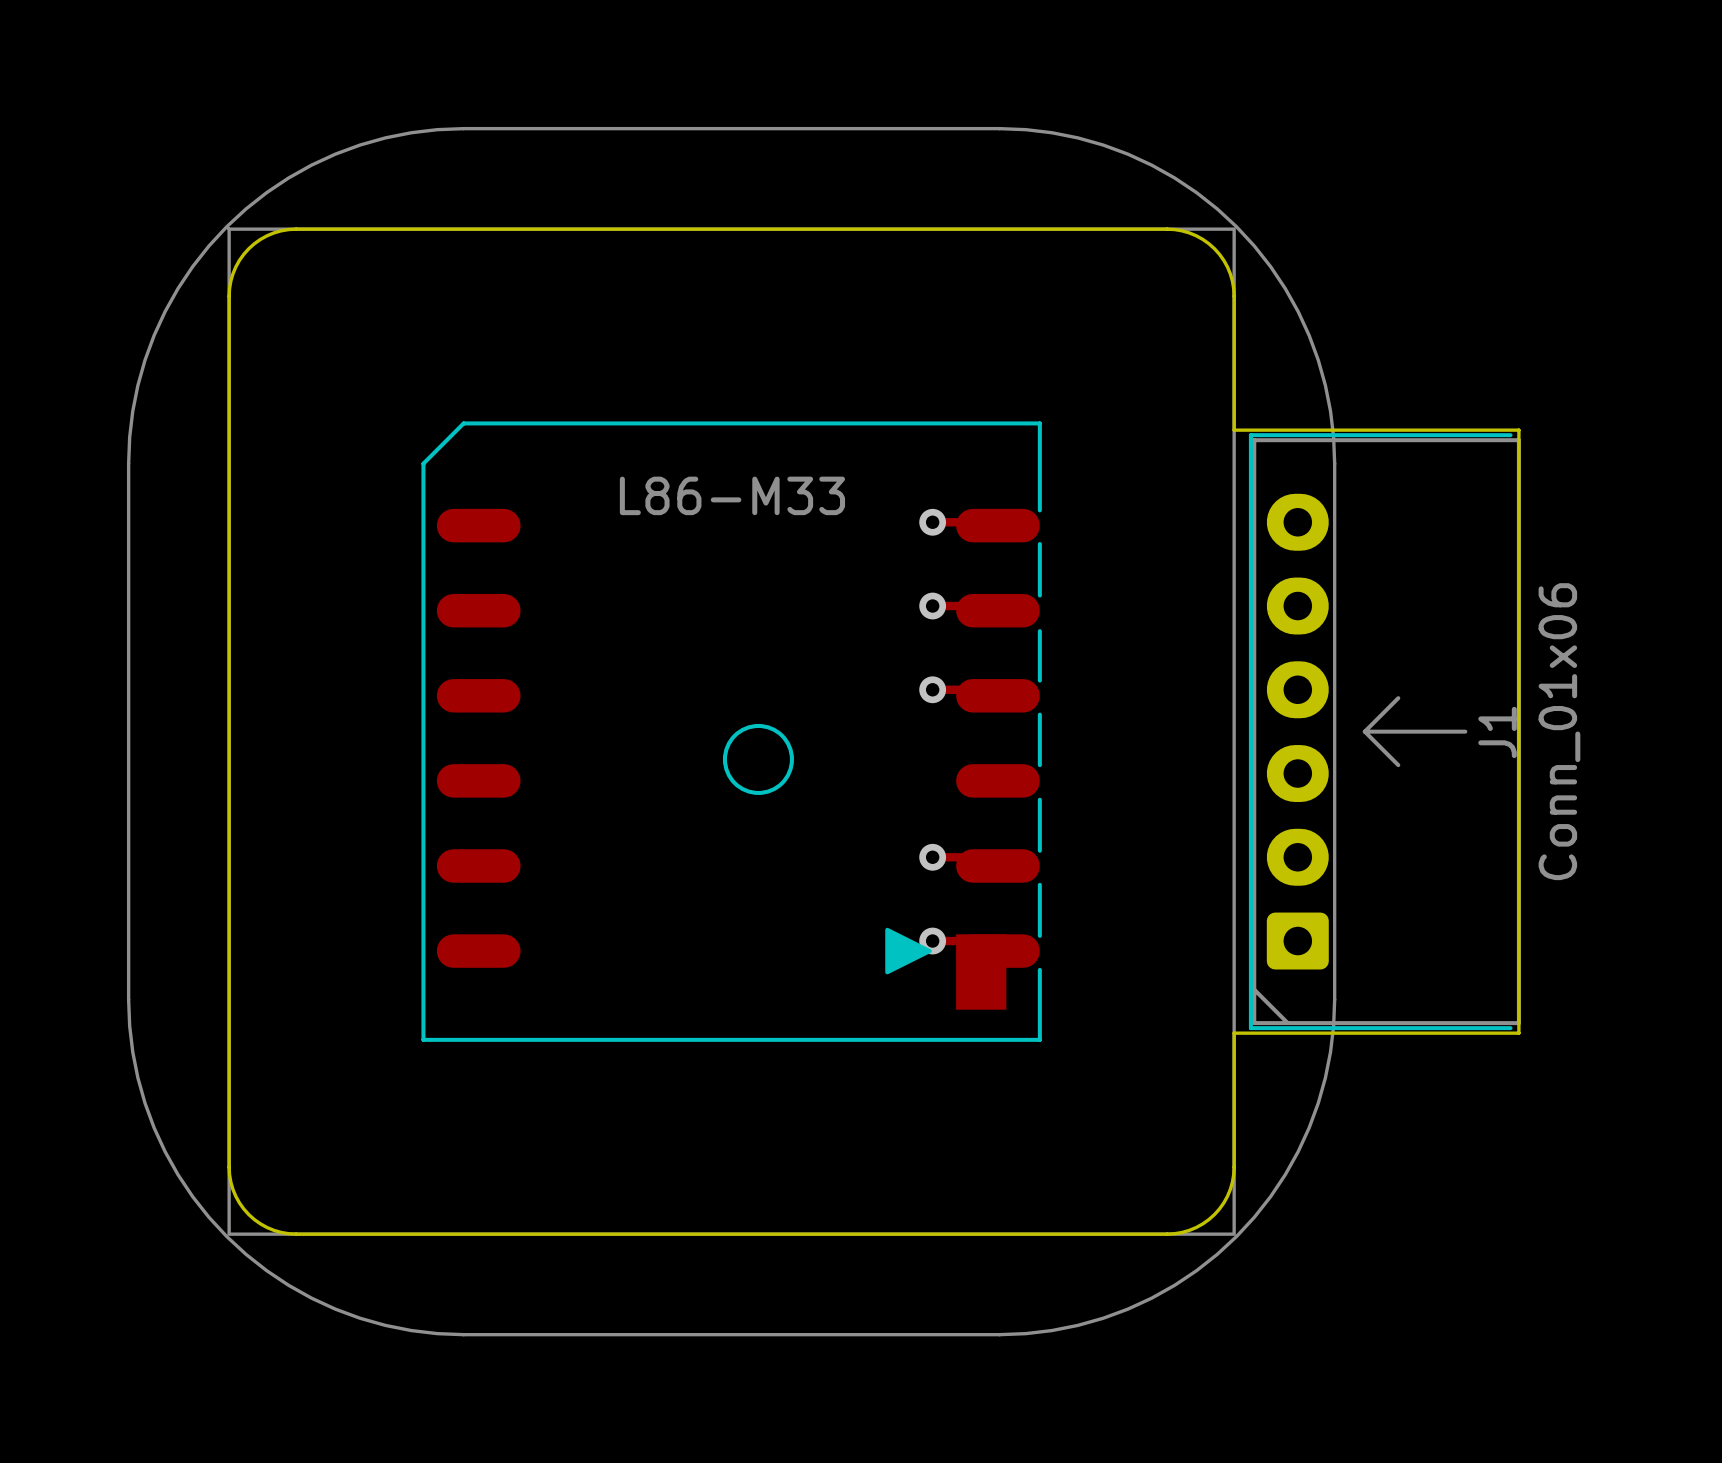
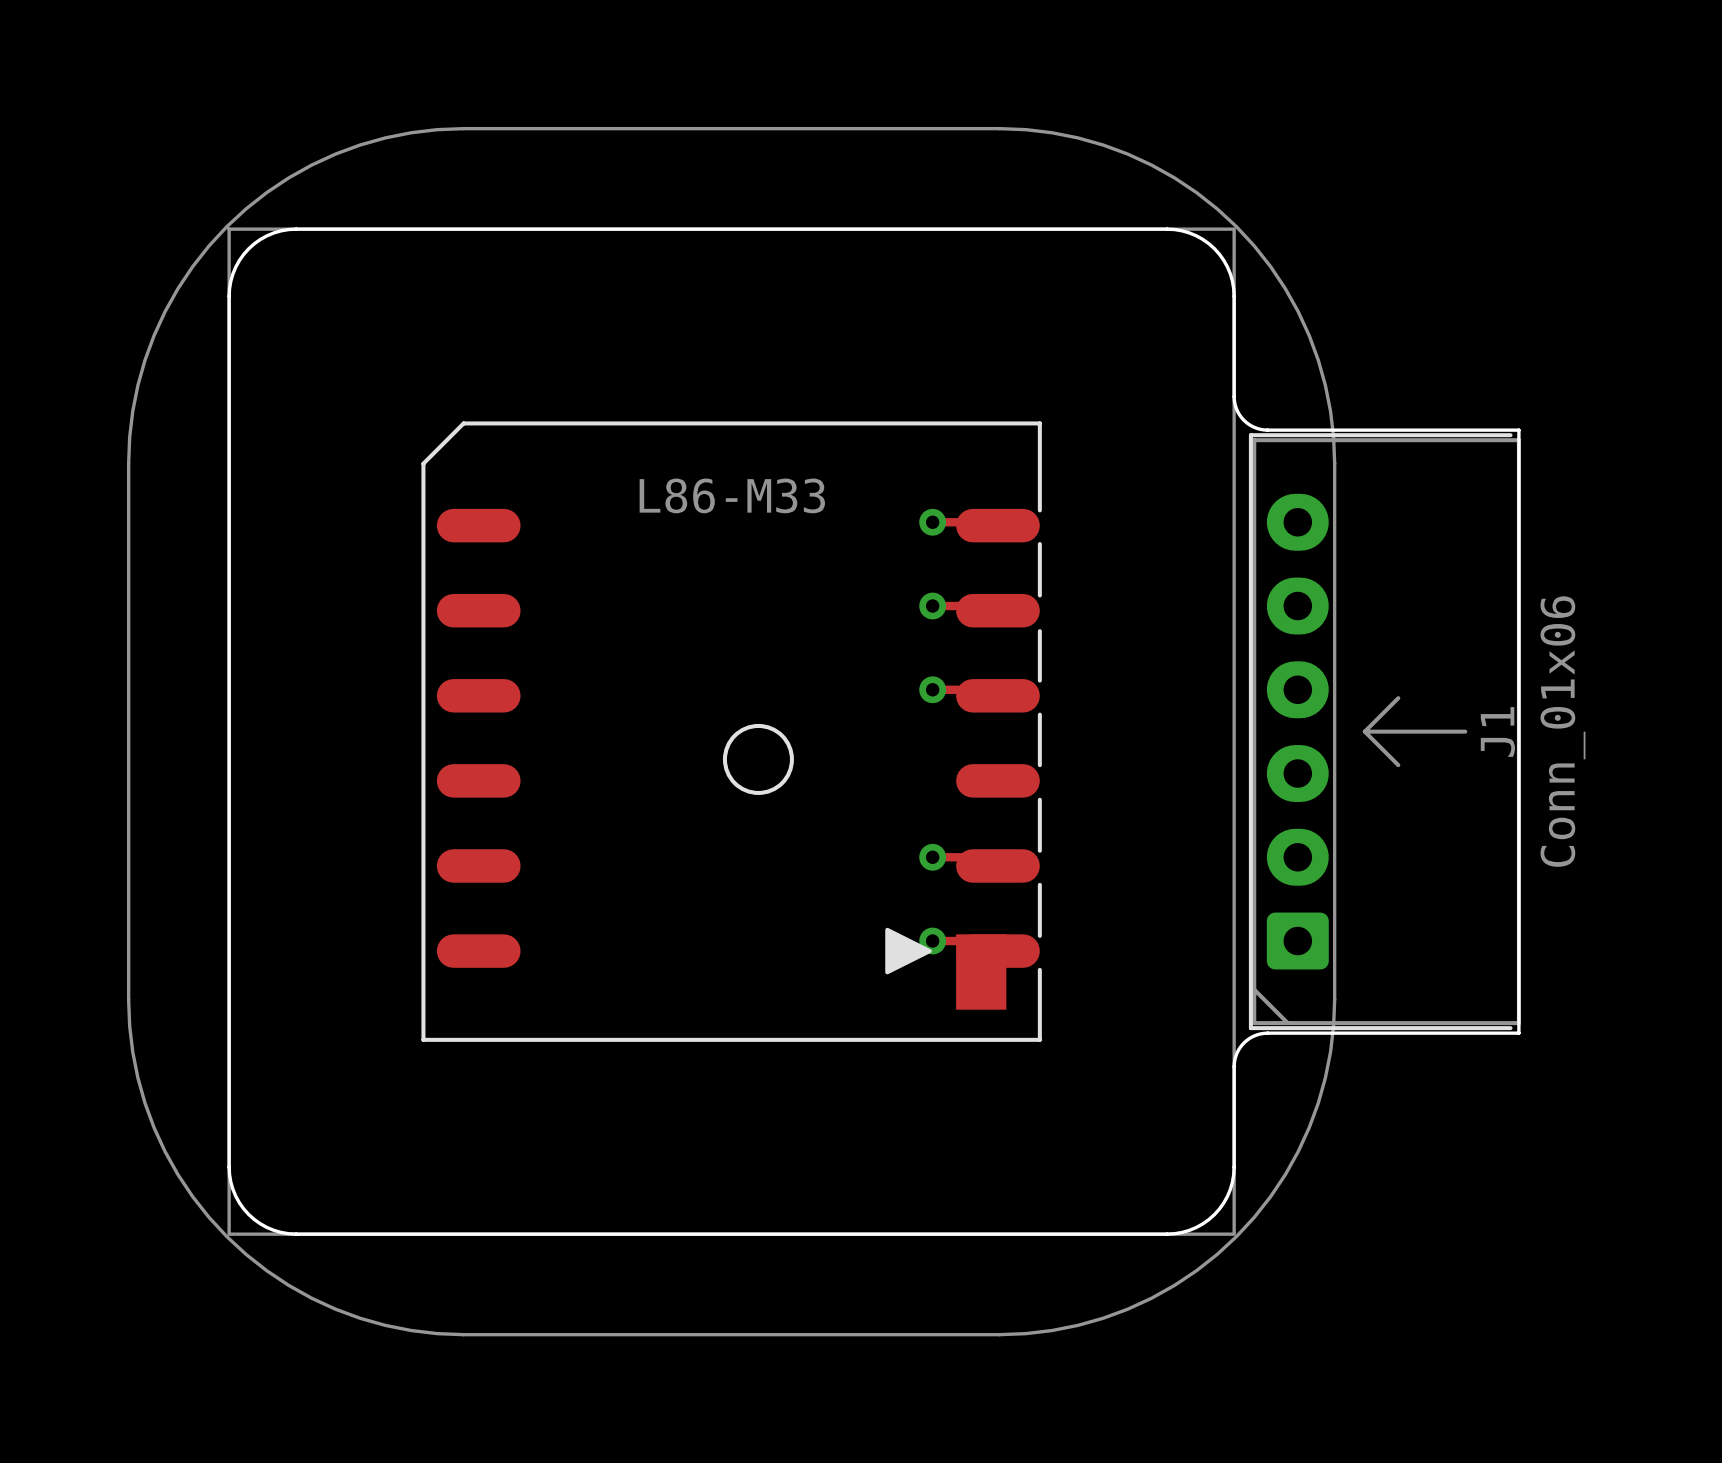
board edge: (1234, 396) (1234, 430) (1267, 430) -> (1234, 396) (1237, 411) (1243, 420) (1253, 426) (1267, 430)
board edge: (1267, 1033) (1234, 1033) (1234, 1066) -> (1267, 1033) (1253, 1036) (1243, 1042) (1237, 1052) (1234, 1066)

